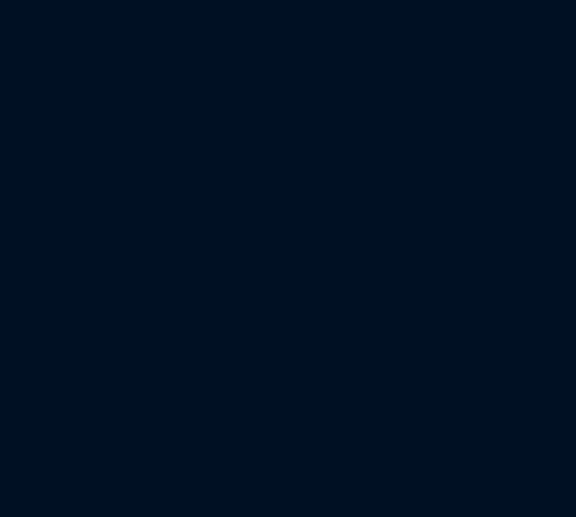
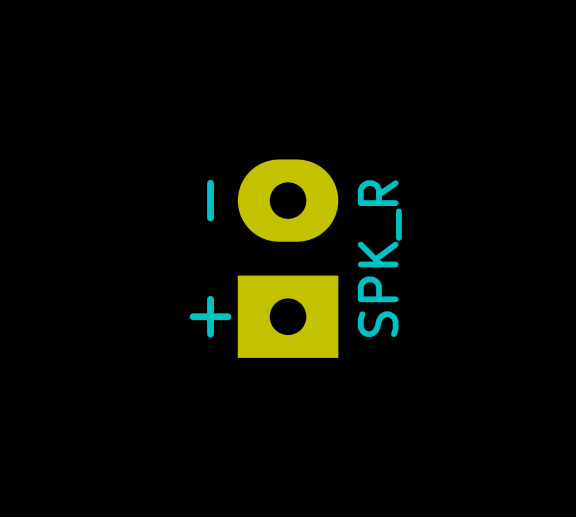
part: none -> SPK_R (288, 258)

